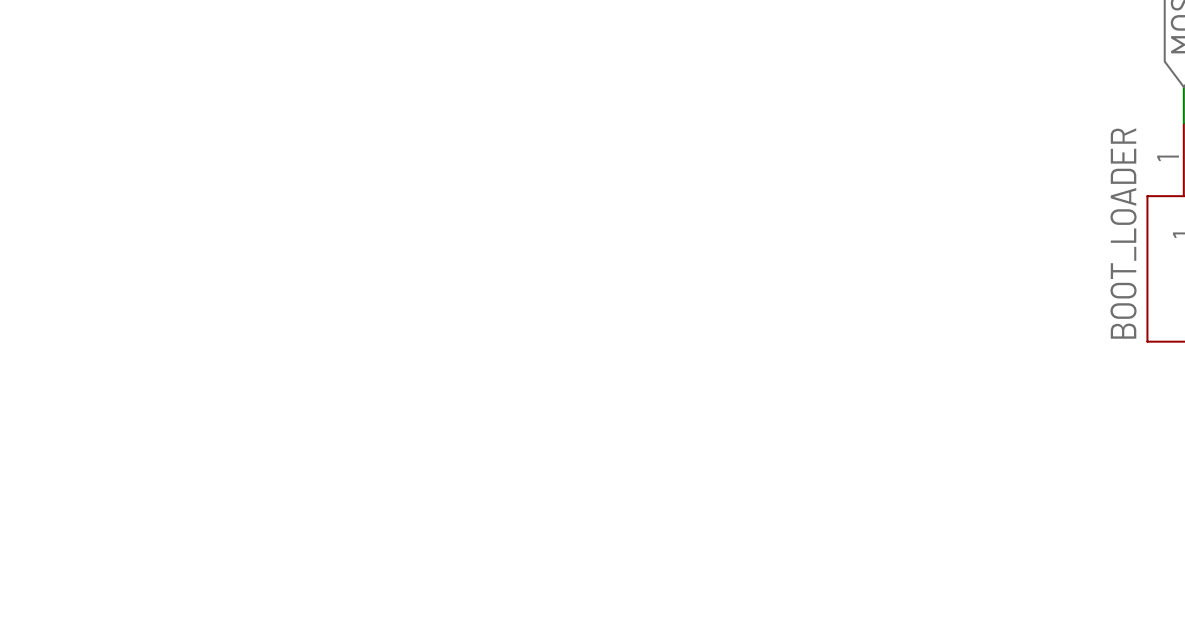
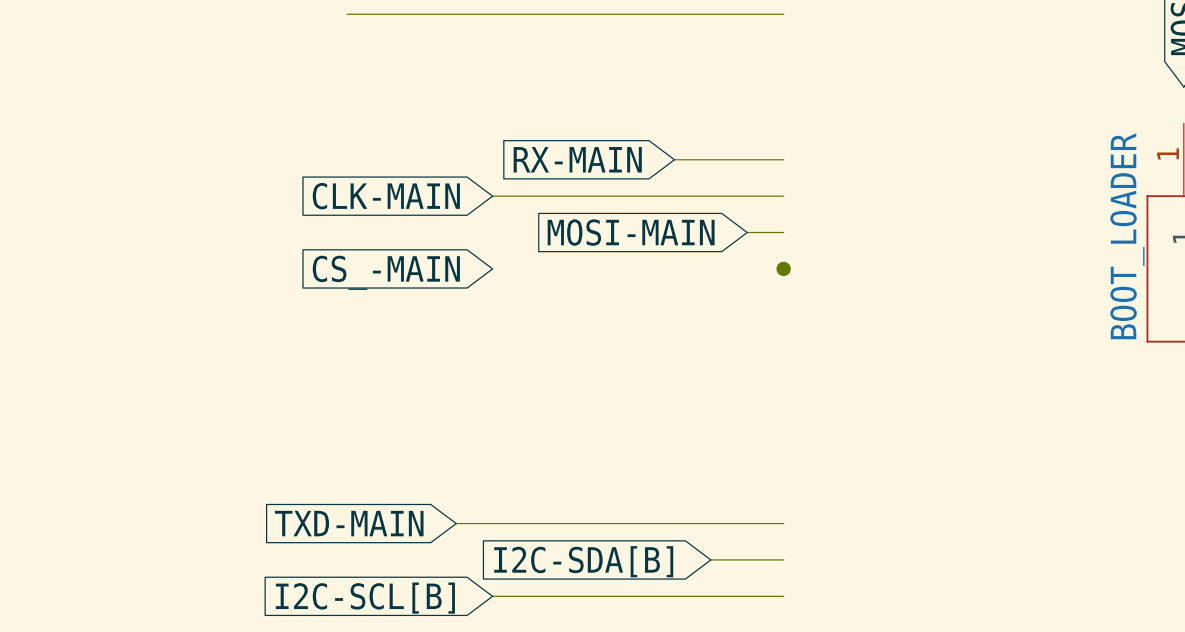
wire: none -> (347, 14) (783, 14)
wire: (1183, 87) (1183, 123) -> none
global label: none -> RX-MAIN (577, 159)
wire: none -> (674, 159) (783, 159)
global label: none -> CLK-MAIN (386, 196)
wire: none -> (492, 196) (783, 196)
global label: none -> MOSI-MAIN (631, 232)
wire: none -> (747, 232) (783, 232)
global label: none -> CS_-MAIN (386, 272)
junction: none -> (783, 268)
global label: none -> TXD-MAIN (349, 523)
wire: none -> (456, 523) (783, 523)
wire: none -> (710, 559) (783, 559)
global label: none -> I2C-SDA[B] (583, 561)
wire: none -> (492, 596) (783, 596)
global label: none -> I2C-SCL[B] (365, 598)

